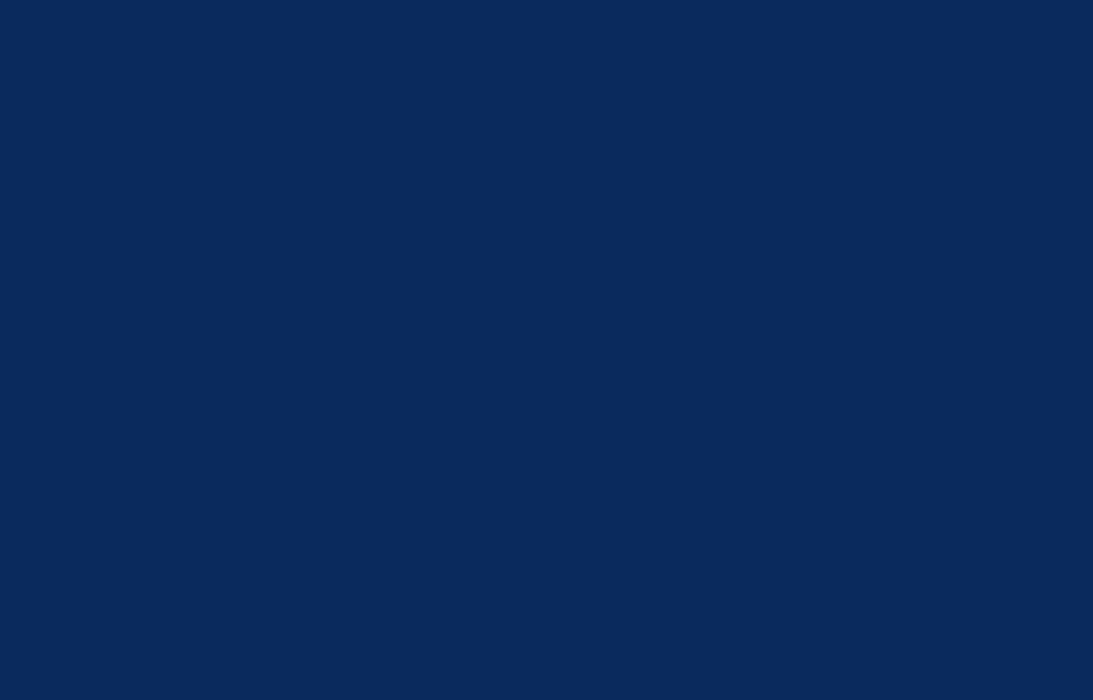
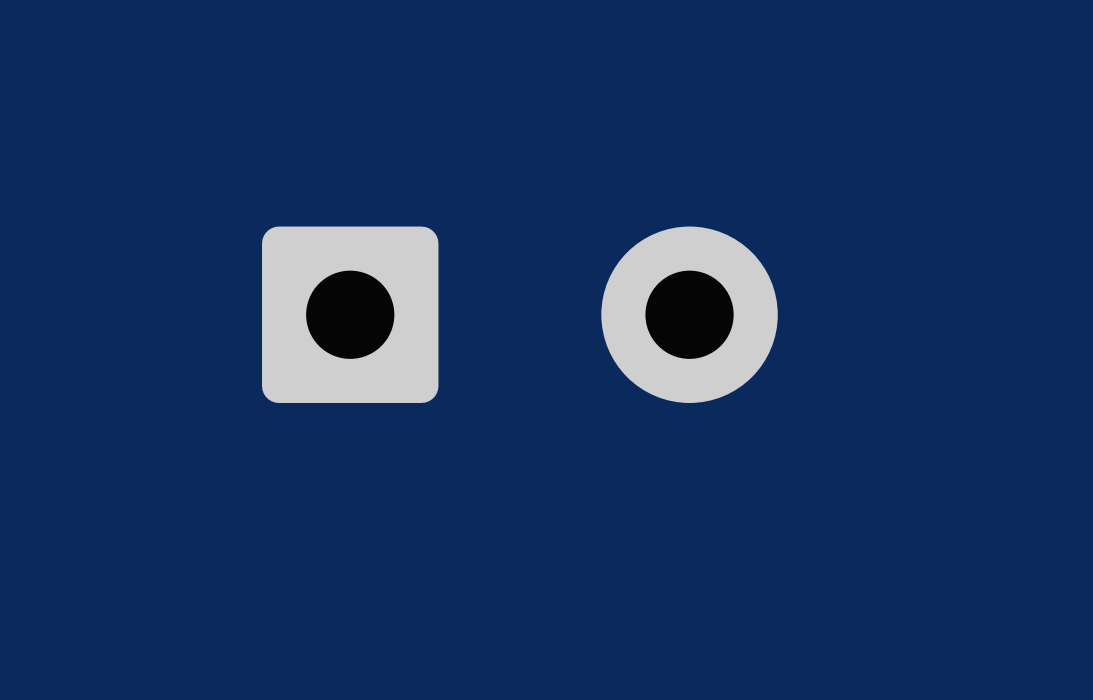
part: none -> (519, 314)

